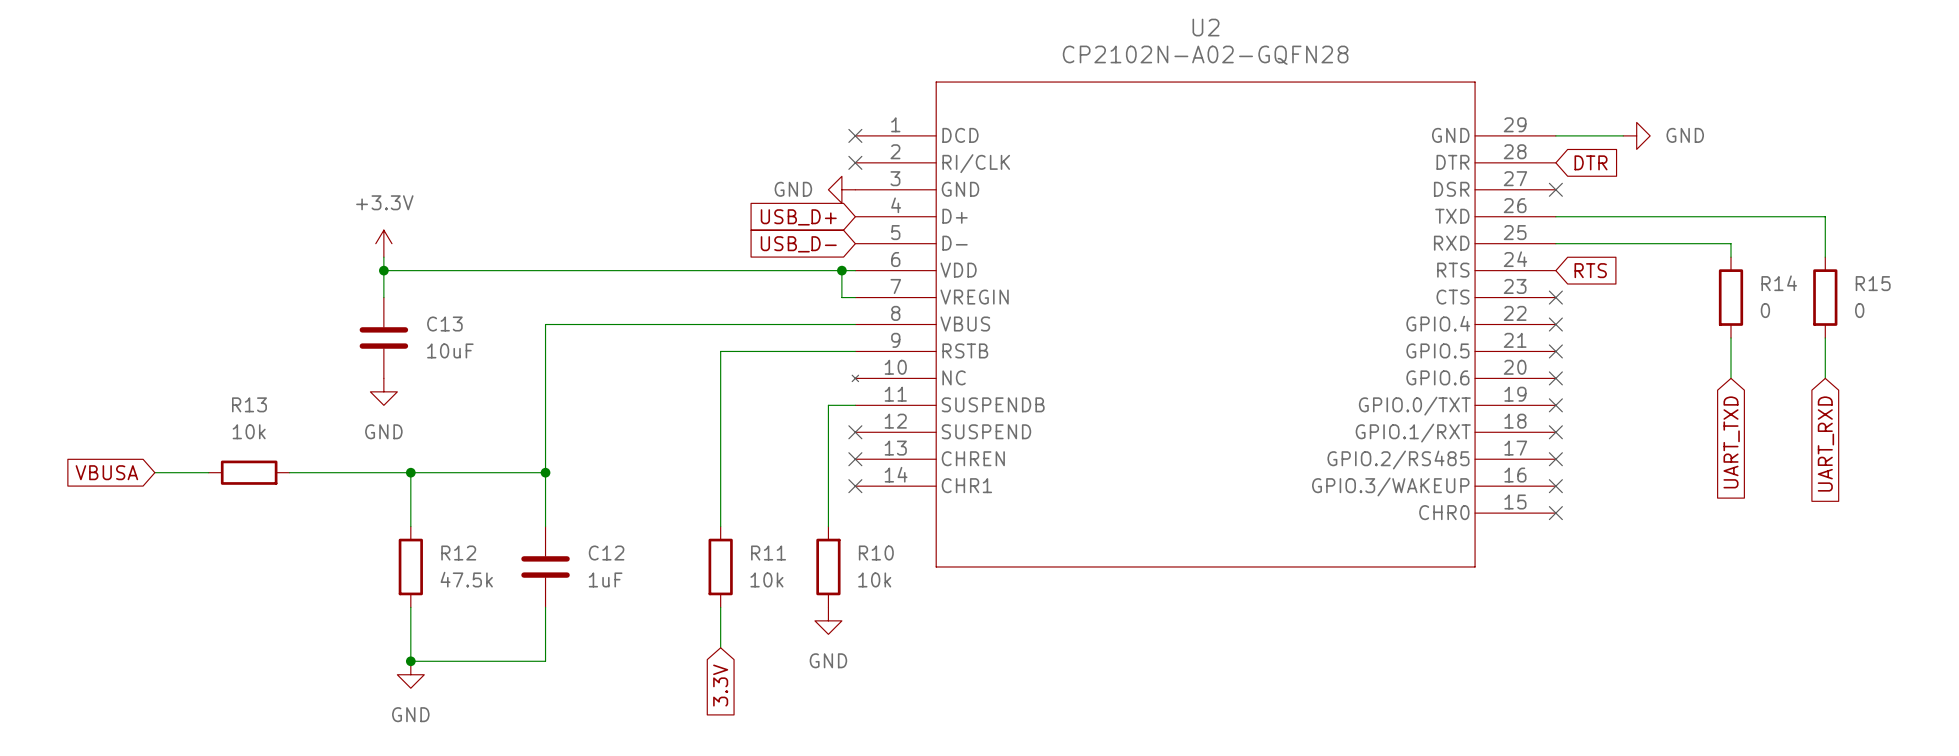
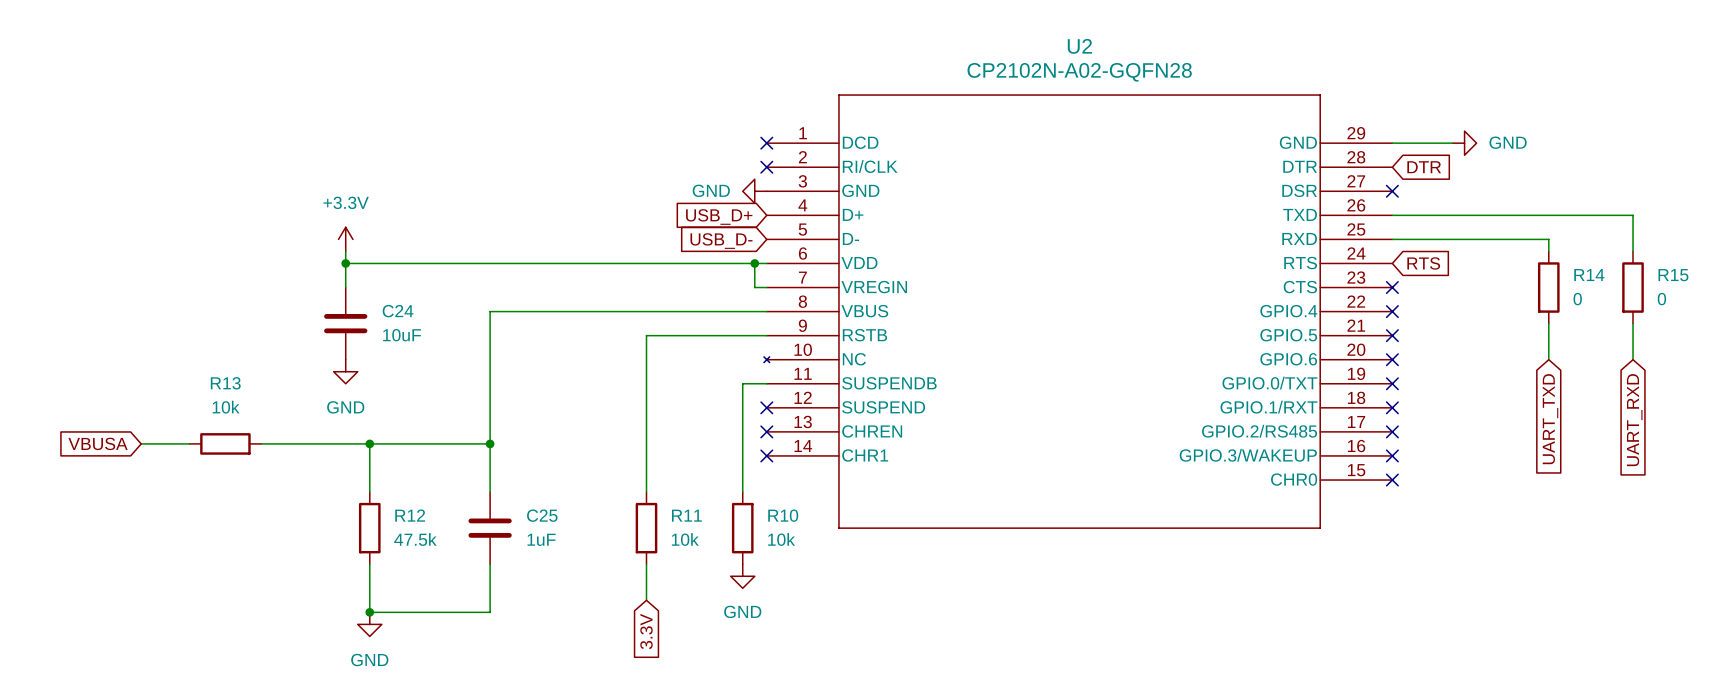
C13 name: C13 (444, 324) -> C24 (398, 311)
C12 name: C12 (606, 553) -> C25 (542, 515)

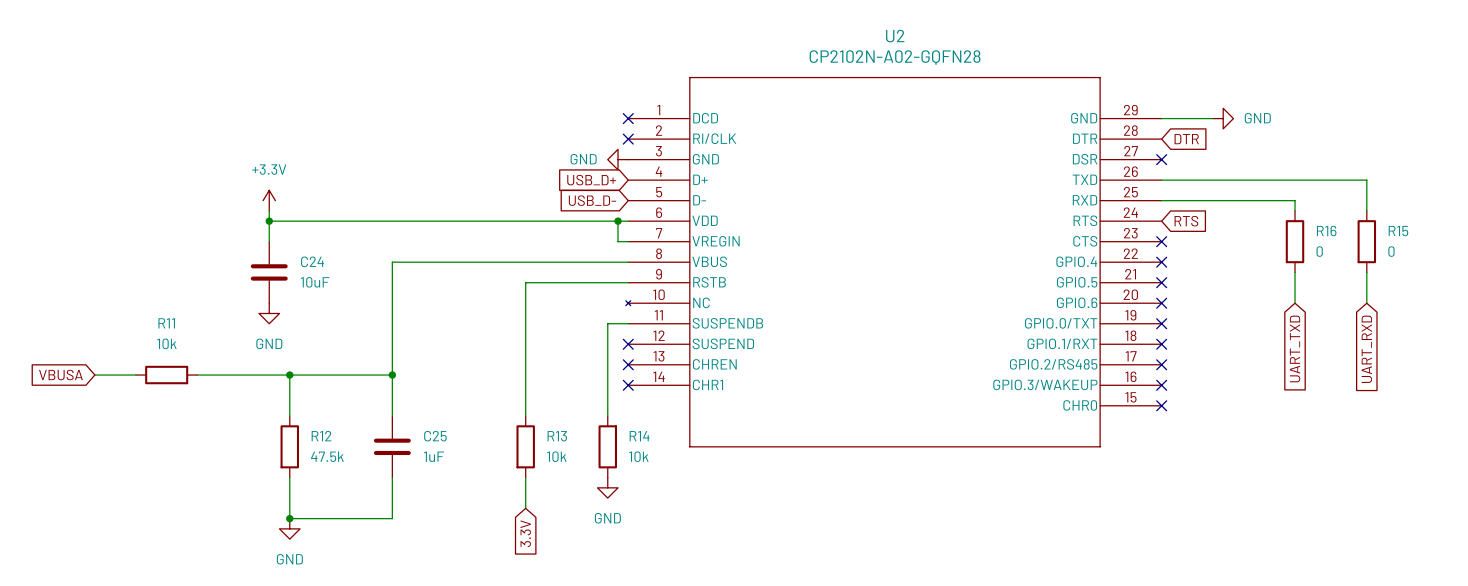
R14 name: R14 (1589, 275) -> R16 (1326, 231)
R13 name: R13 (225, 383) -> R11 (166, 323)
R11 name: R11 (686, 515) -> R13 (557, 436)
R10 name: R10 (783, 515) -> R14 (639, 436)

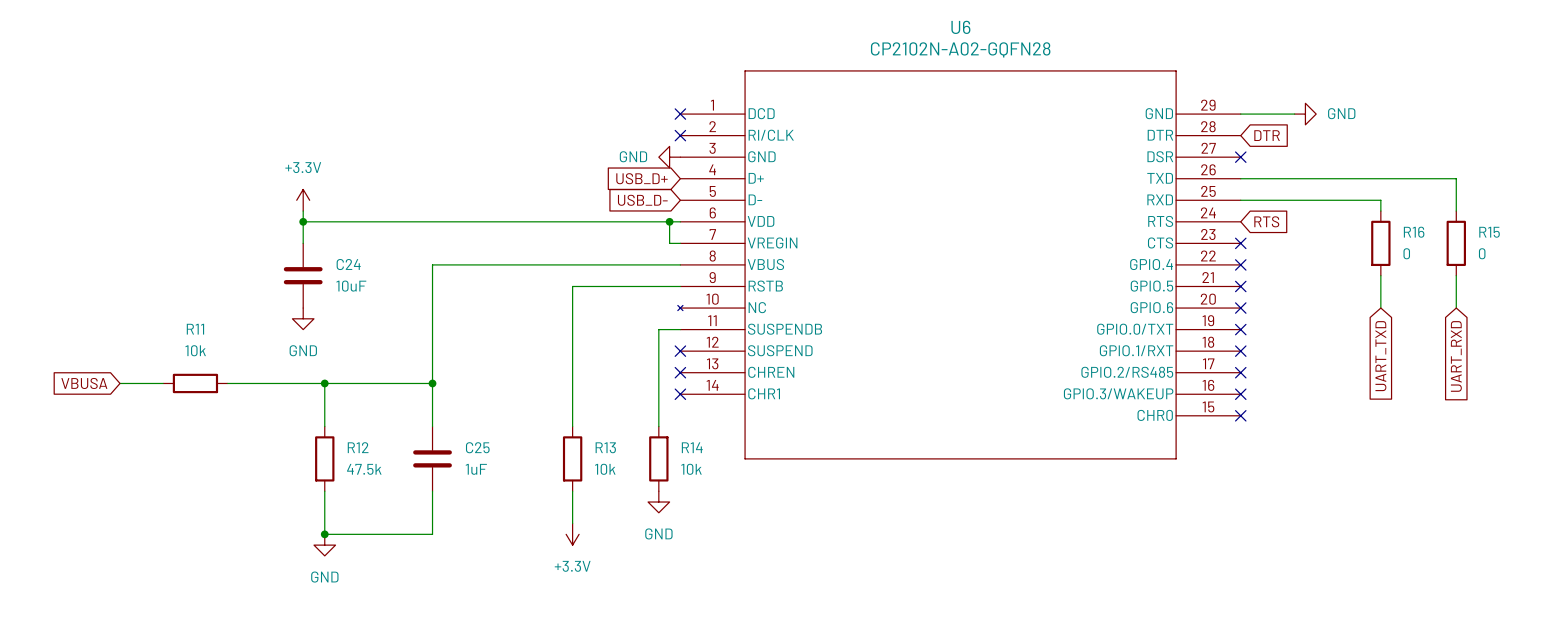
U2 name: U2 (895, 36) -> U6 (960, 27)
power symbol: none -> +3.3V (572, 534)
global label: 3.3V (525, 533) -> none

